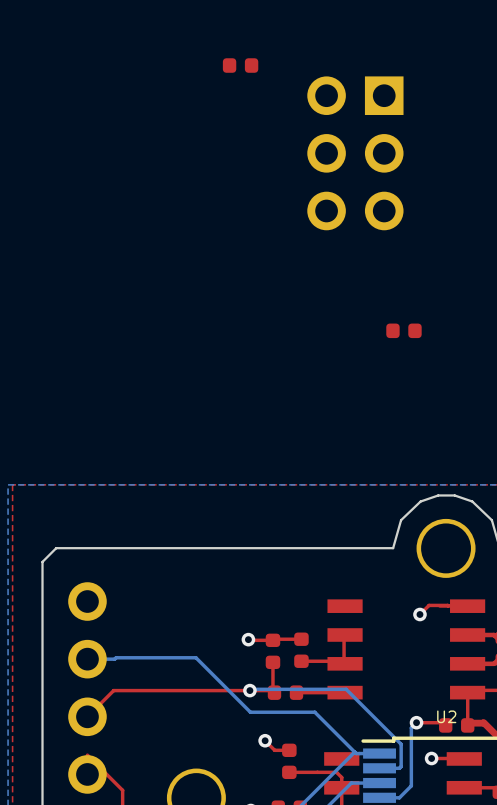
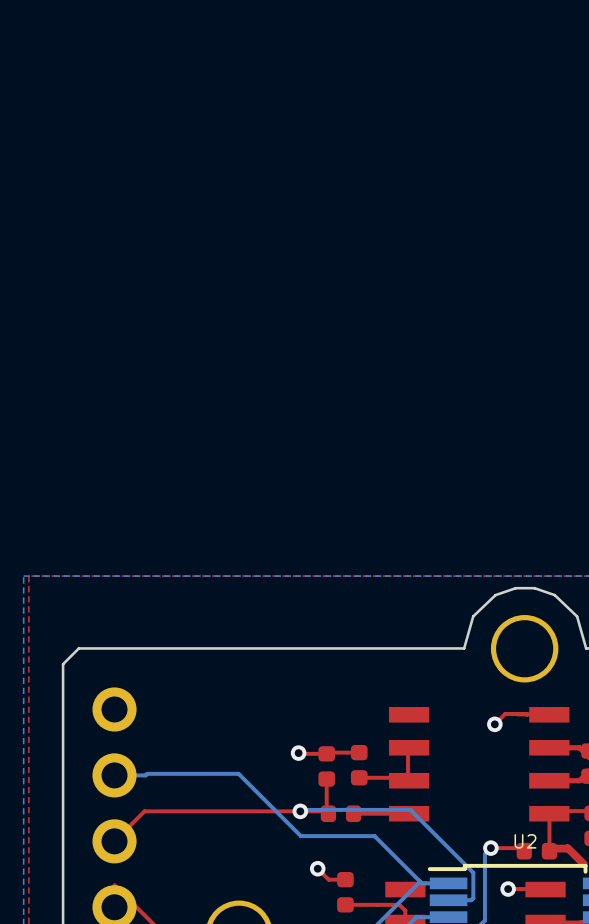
part: (240, 65) -> none
part: (355, 153) -> none
part: (403, 330) -> none

